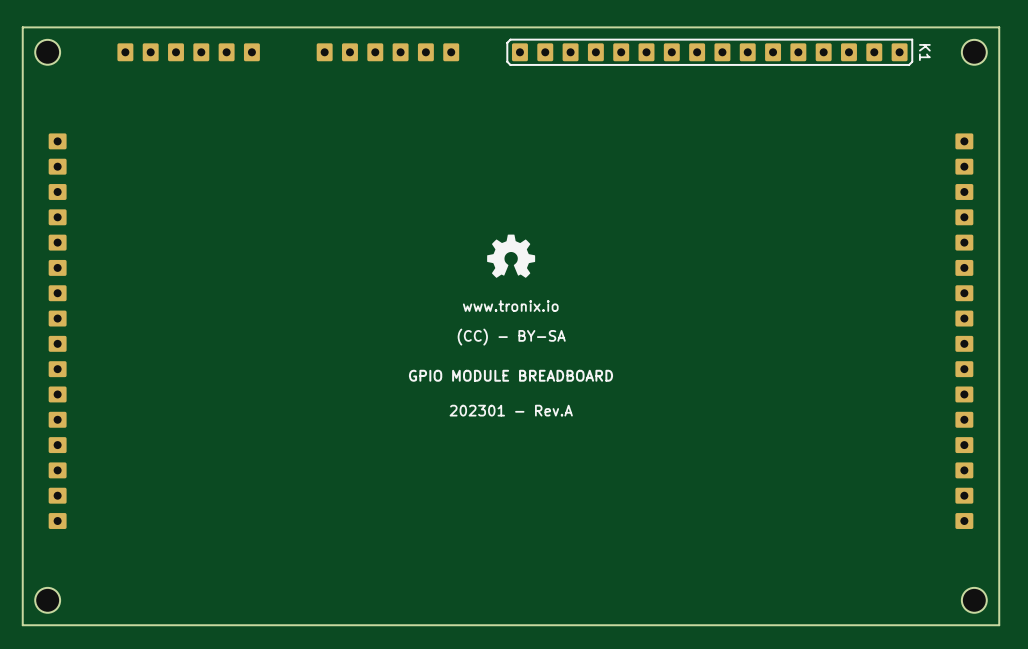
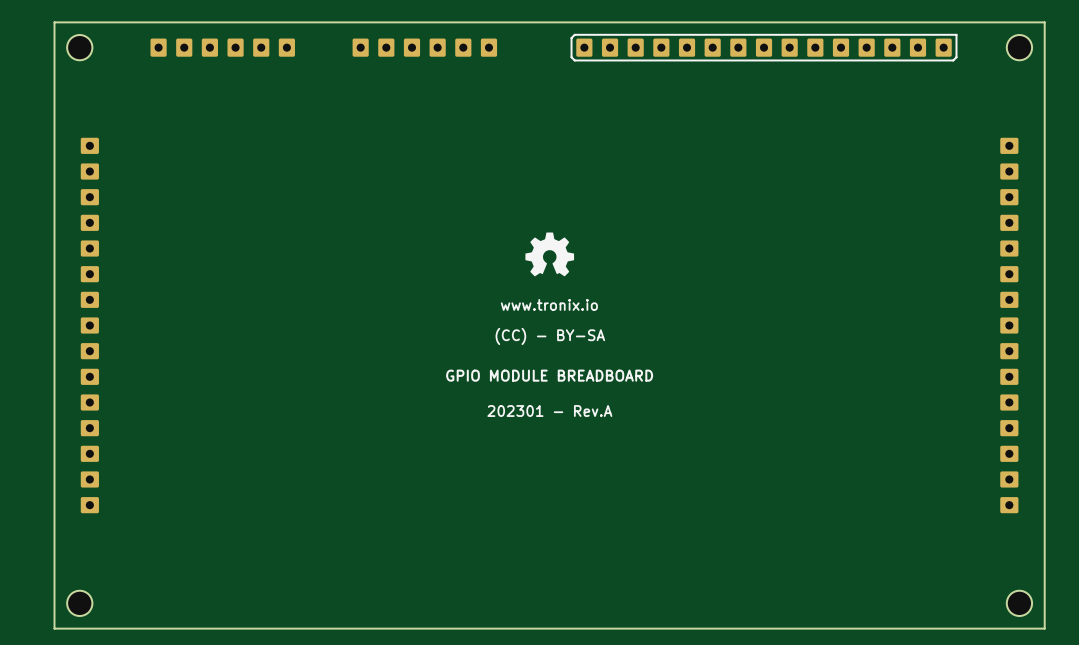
K1: (709, 52) -> none
part: none -> (764, 47)
part footprint: [48, 133, 67, 529] -> [80, 137, 99, 514]
part footprint: [955, 133, 974, 529] -> [1000, 137, 1019, 514]

